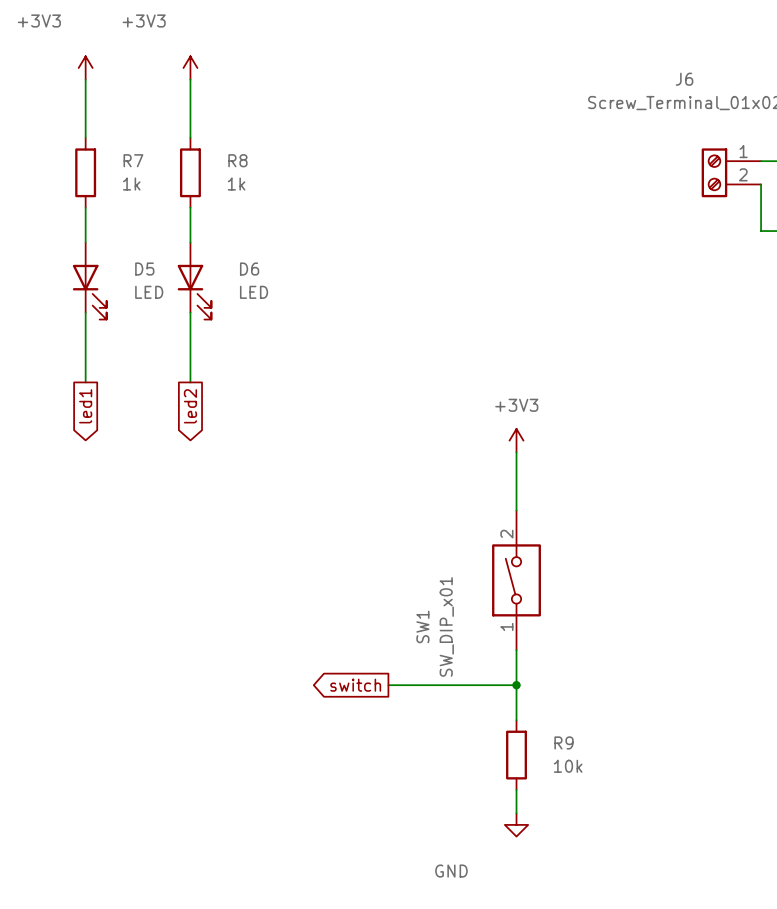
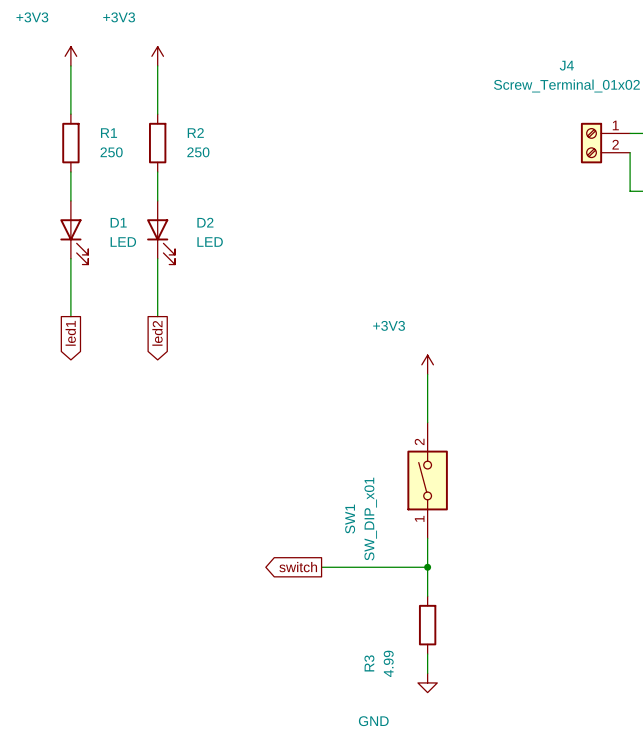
J6 name: J6 (684, 79) -> J4 (566, 65)
R7 name: R7 (133, 160) -> R1 (109, 133)
R8 name: R8 (237, 160) -> R2 (195, 133)
R7 value: 1k (131, 184) -> 250 (111, 152)
R8 value: 1k (236, 184) -> 250 (198, 152)
D5 name: D5 (144, 269) -> D1 (118, 222)
D6 name: D6 (249, 269) -> D2 (205, 222)
power symbol text position: +3V3 (516, 405) -> +3V3 (389, 325)
R9 name: R9 (564, 742) -> R3 (369, 663)
R9 value: 10k (568, 766) -> 4.99 (388, 663)

